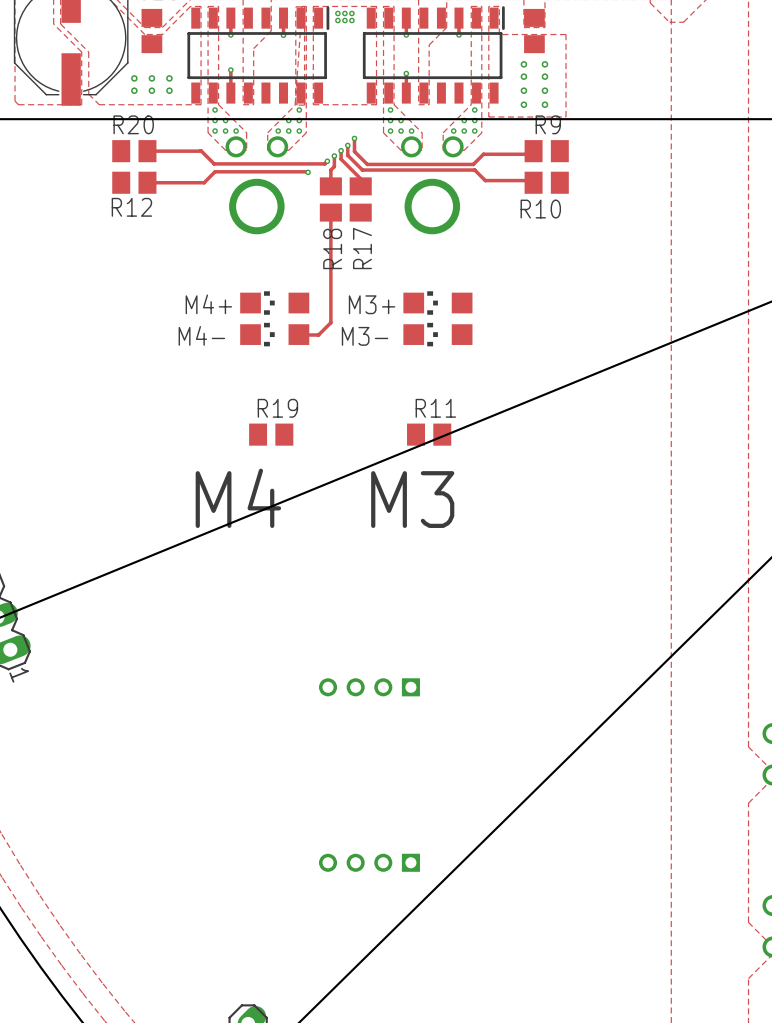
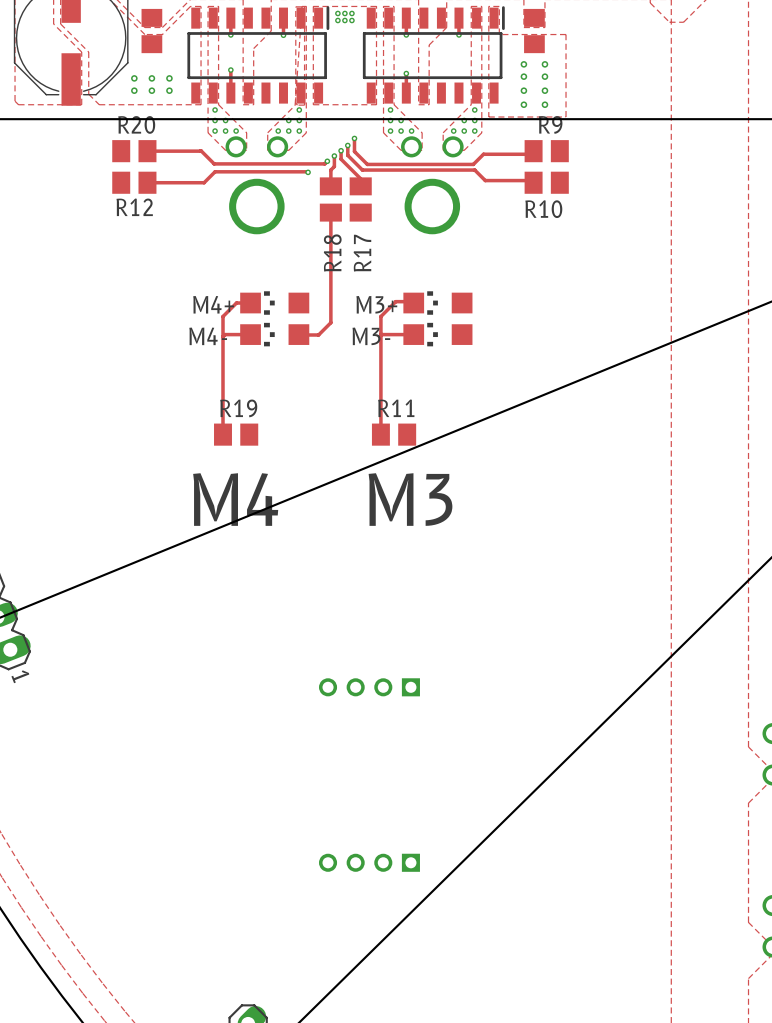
track: none -> (250, 303) (236, 303) (222, 316) (222, 434)
track: none -> (413, 303) (395, 301) (380, 316) (380, 434)
track: none -> (250, 334) (225, 334) (222, 336)
track: none -> (413, 334) (380, 335)
R19 position: (271, 434) -> (236, 434)
R11 position: (429, 434) -> (394, 434)

